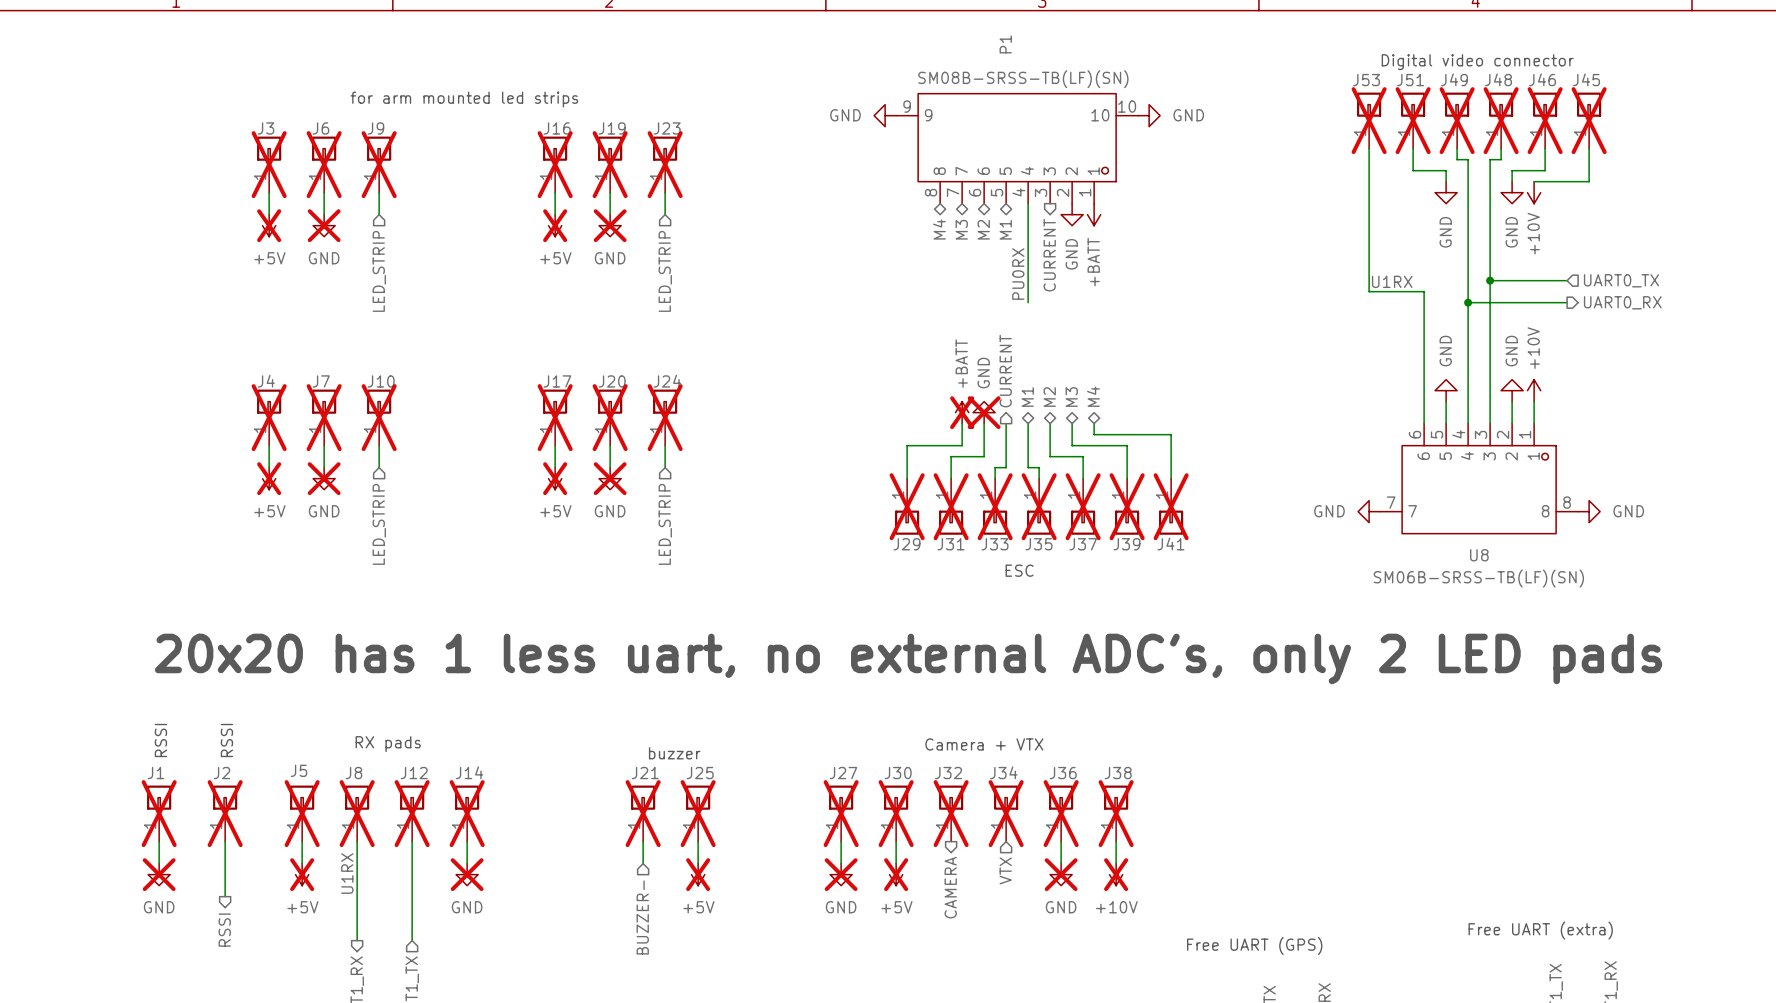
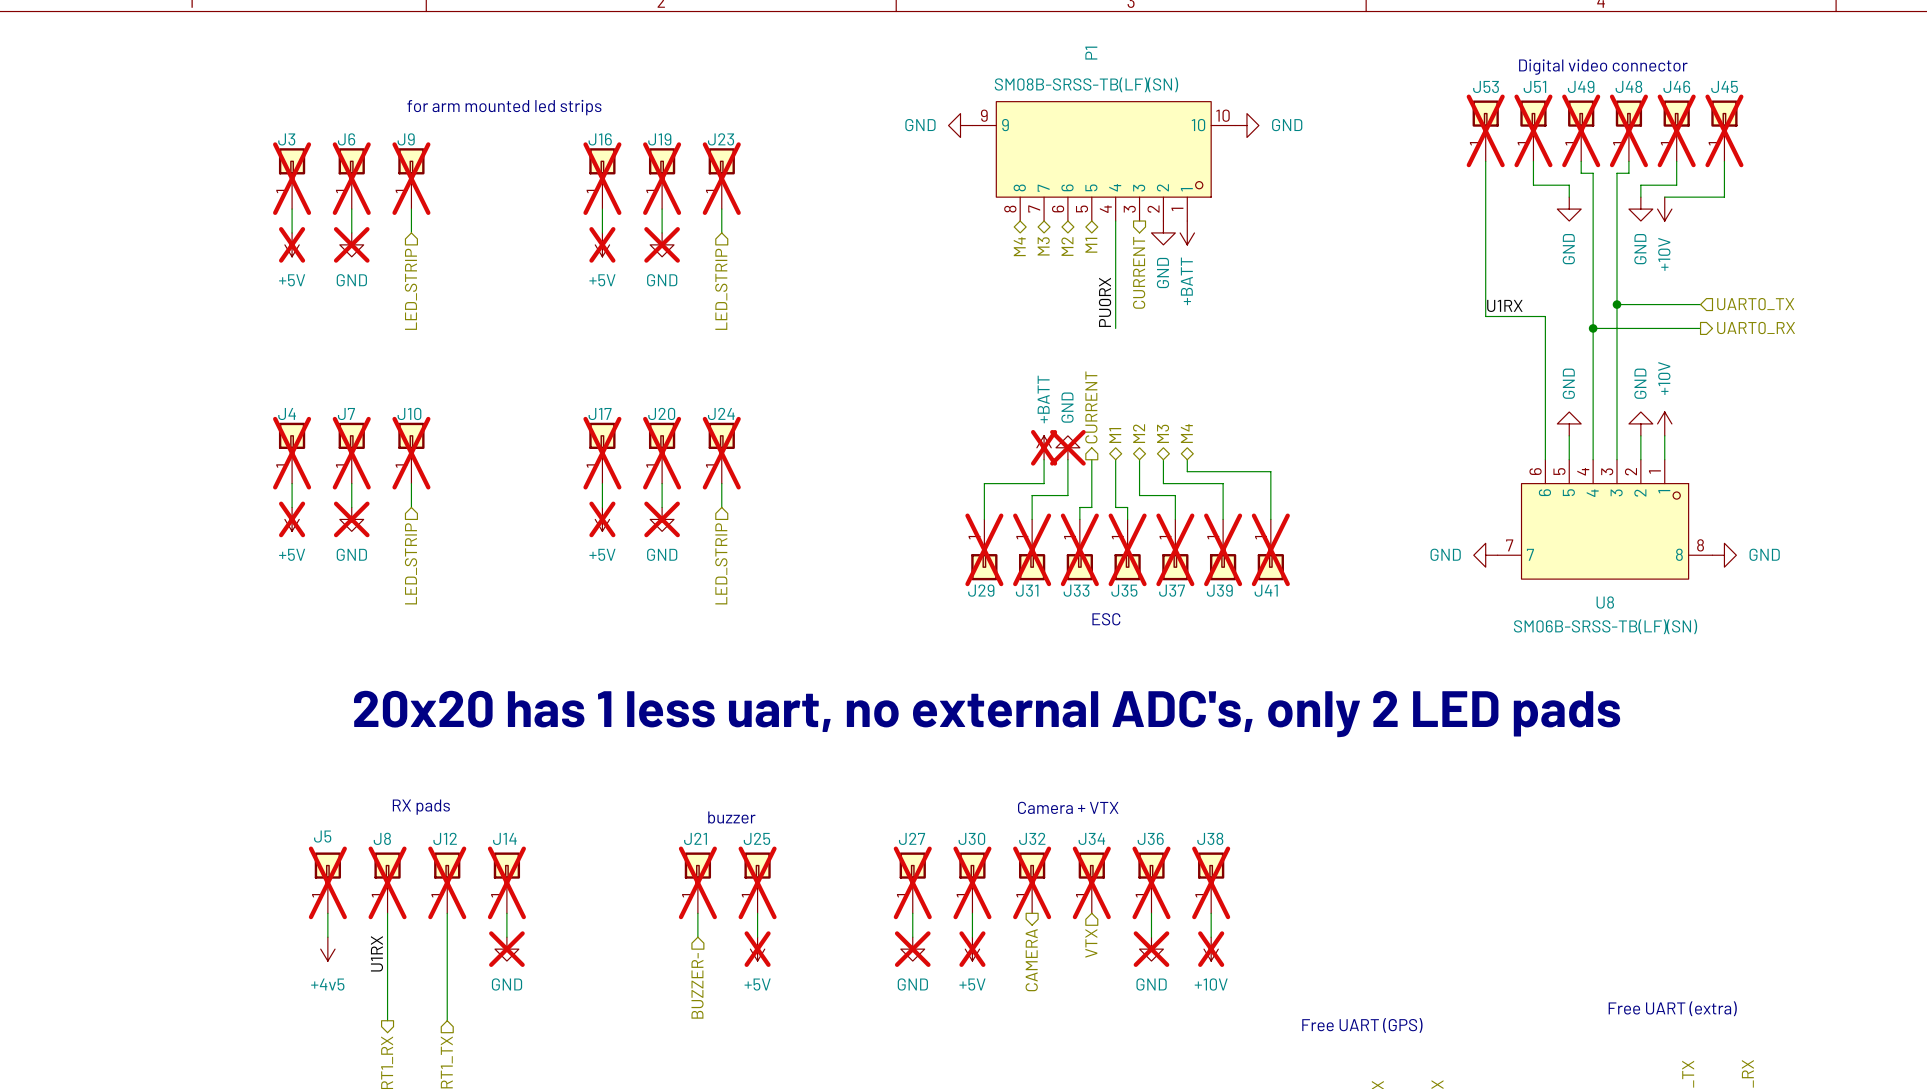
text: RSSI (160, 740) -> none
text: RSSI (226, 740) -> none
J1: (159, 813) -> none
J2: (225, 813) -> none
wire: (159, 841) (159, 863) -> none
wire: (225, 841) (225, 896) -> none
power symbol: GND (159, 874) -> none
power symbol: +5V (302, 874) -> +4v5 (327, 949)
hierarchical label: RSSI (224, 930) -> none

